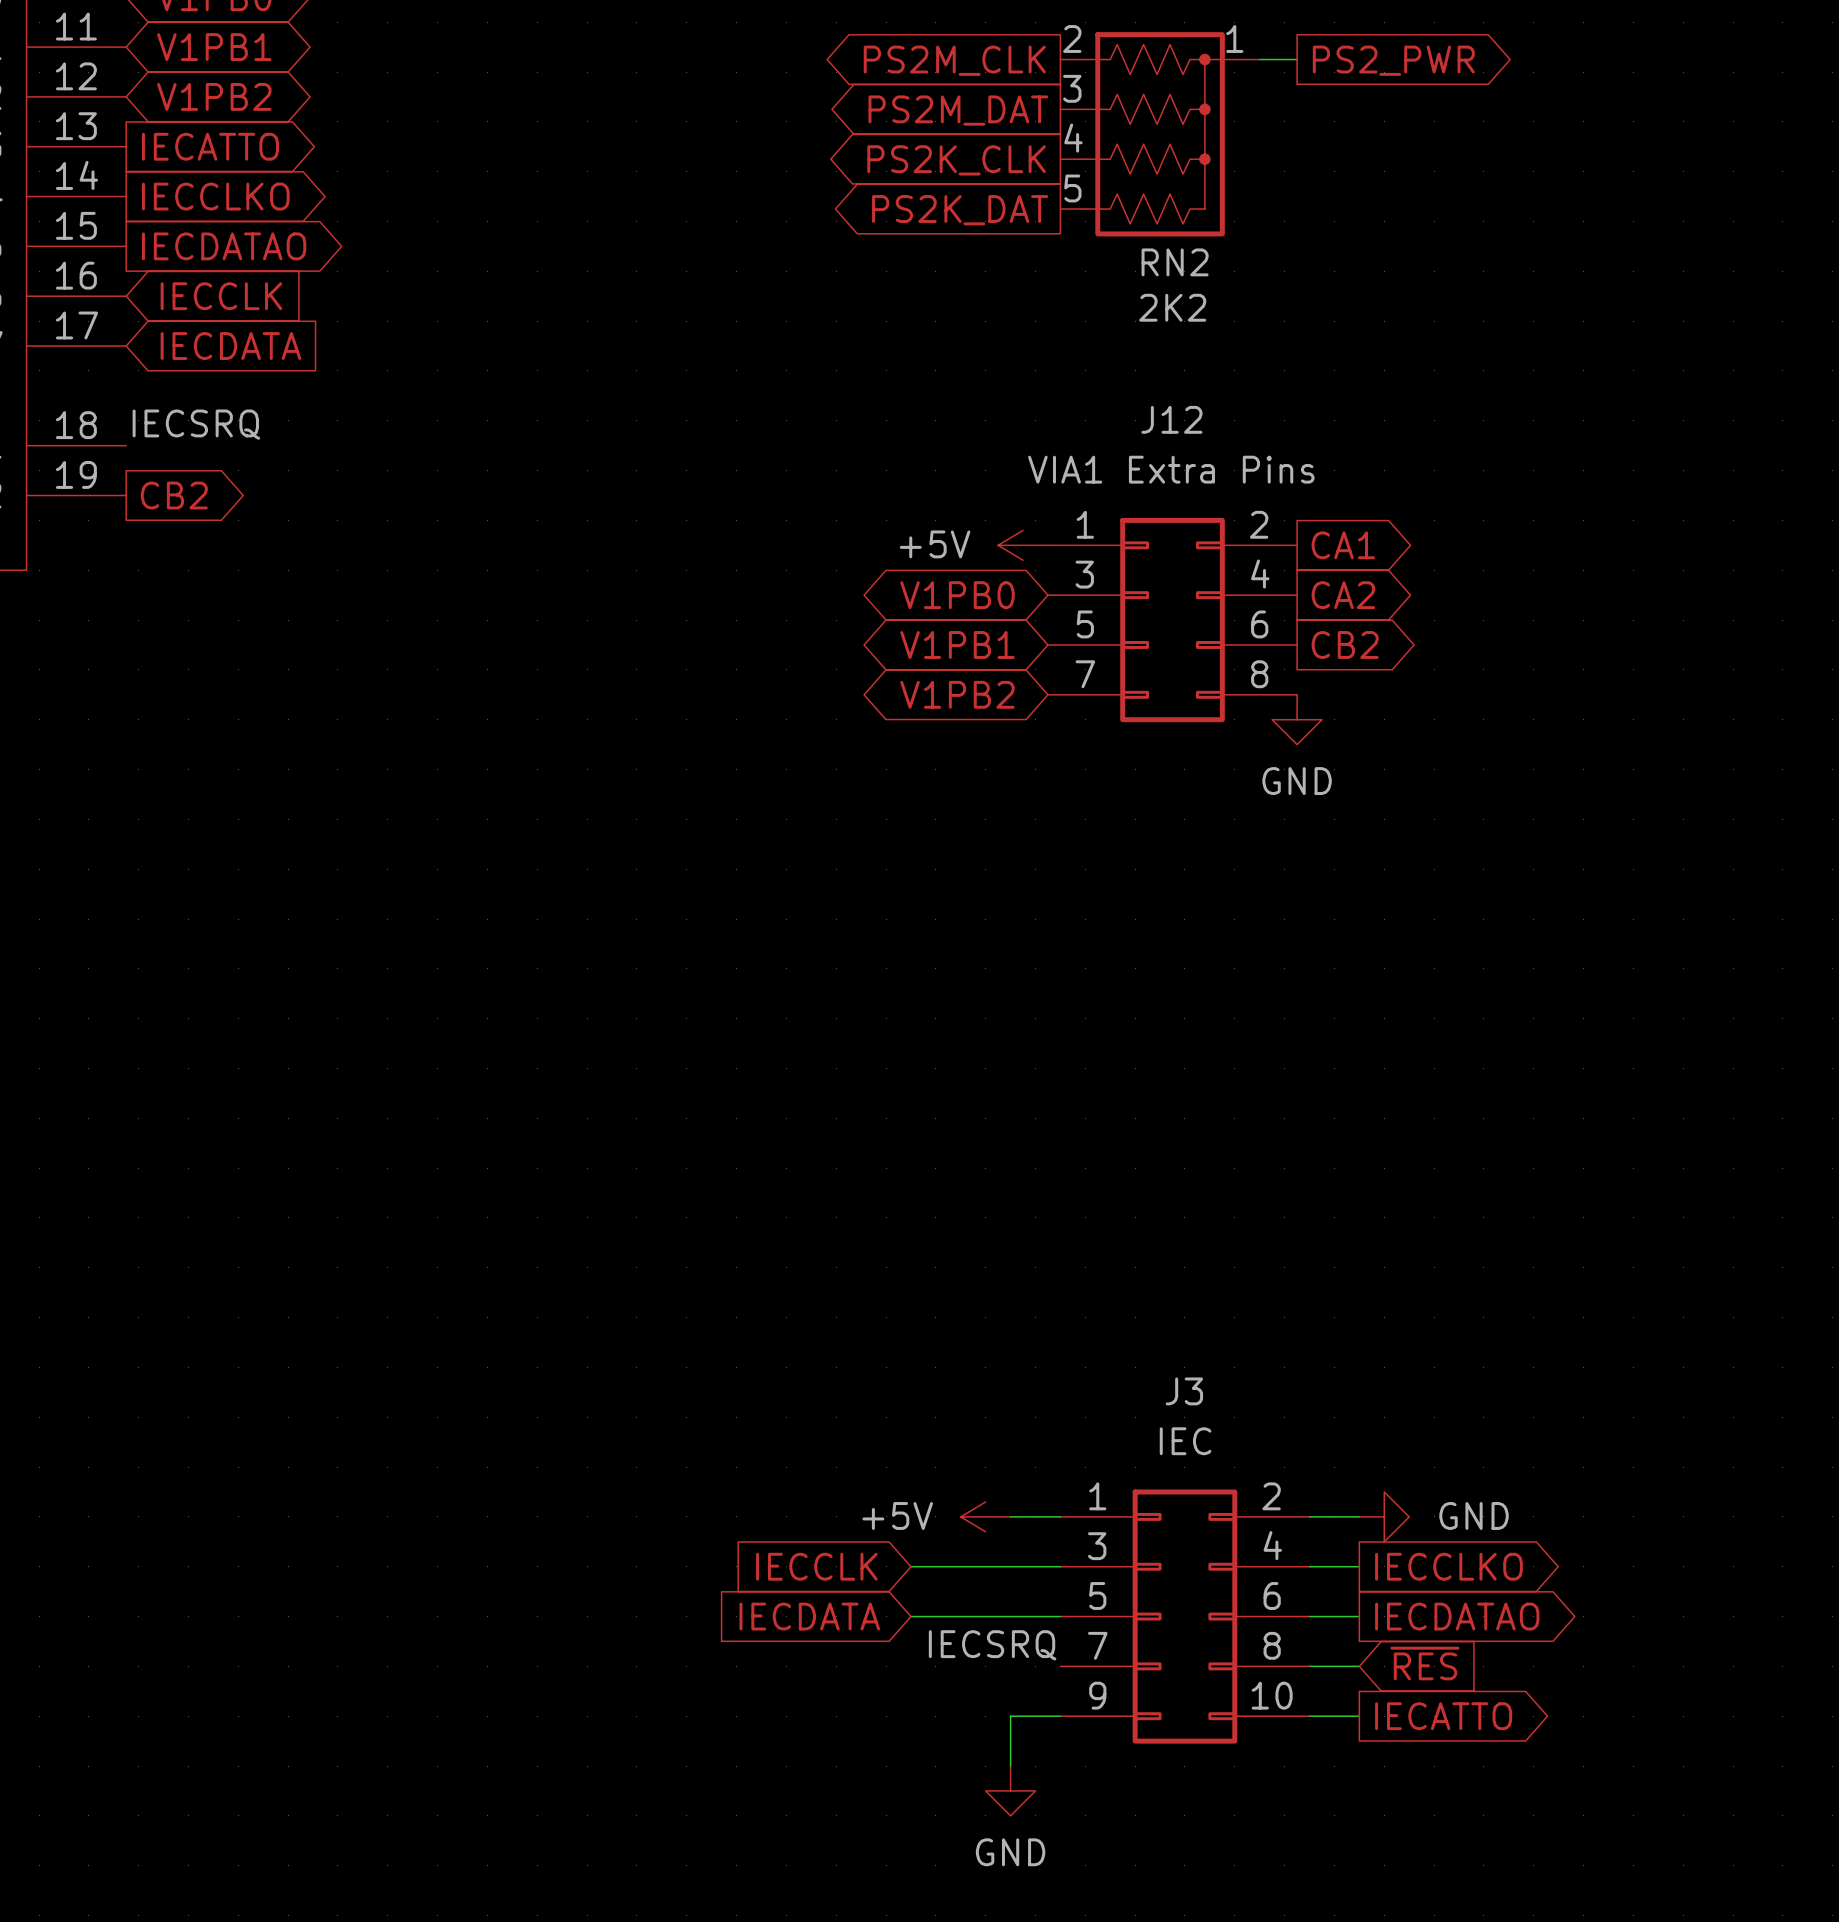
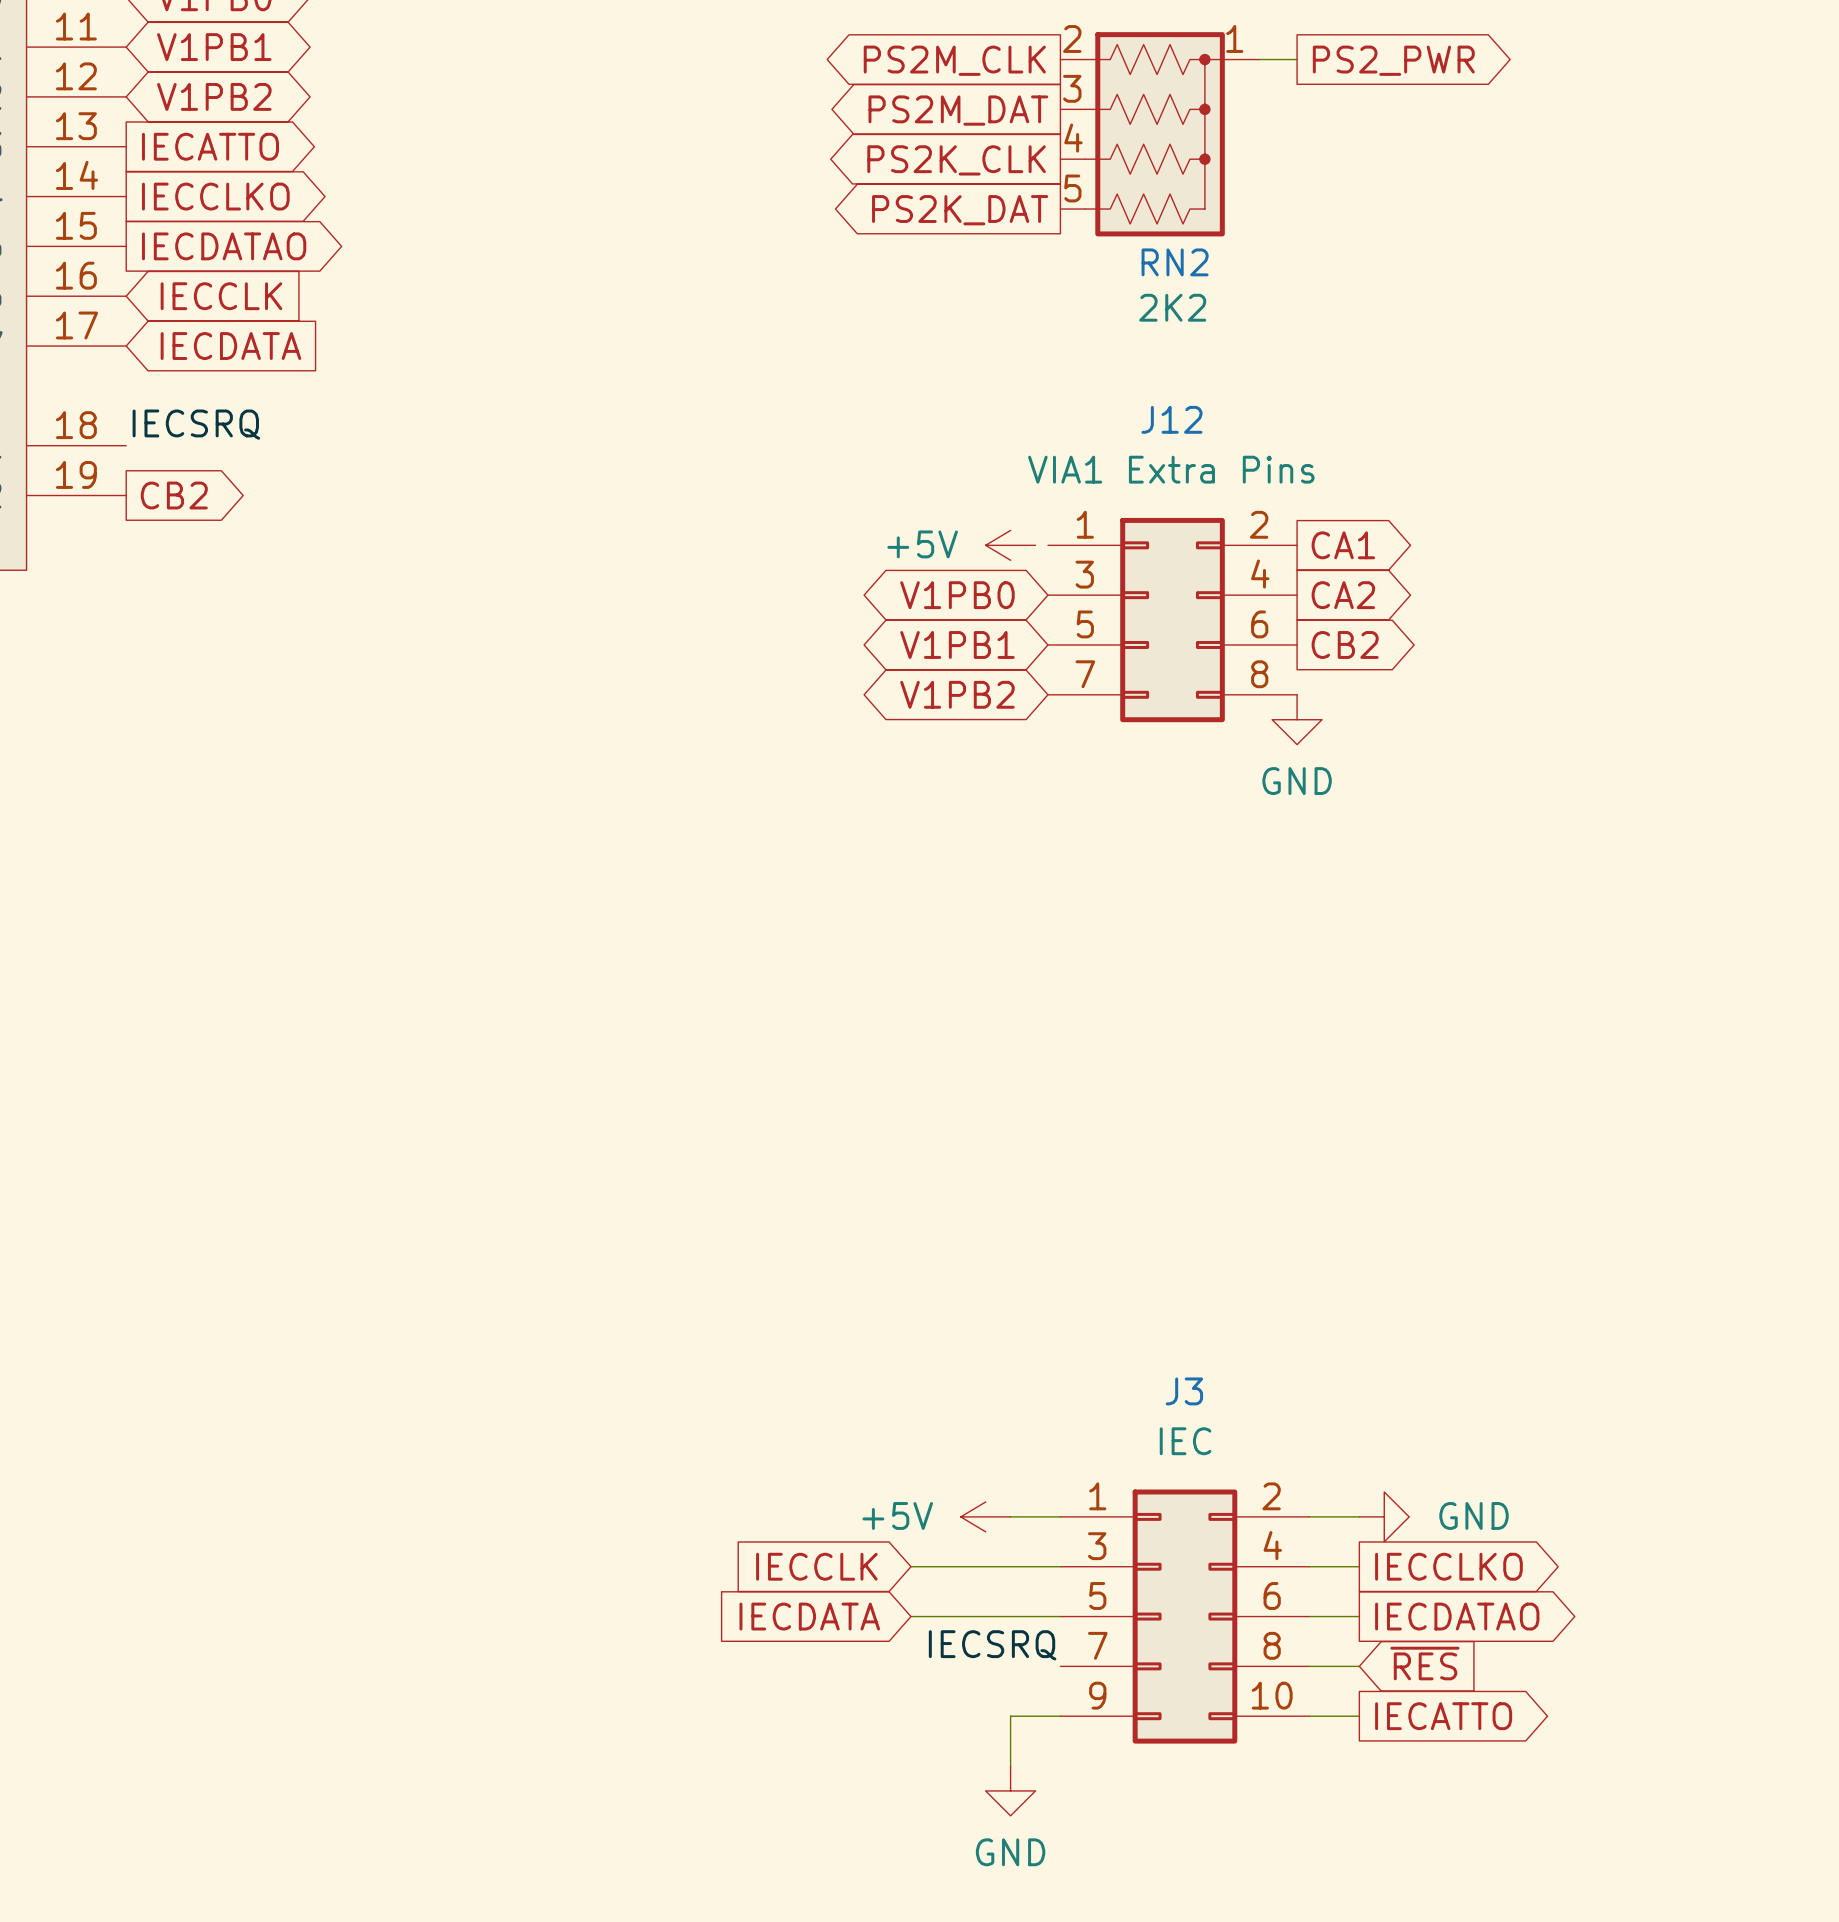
power symbol position: +5V (1023, 545) -> +5V (1010, 545)

